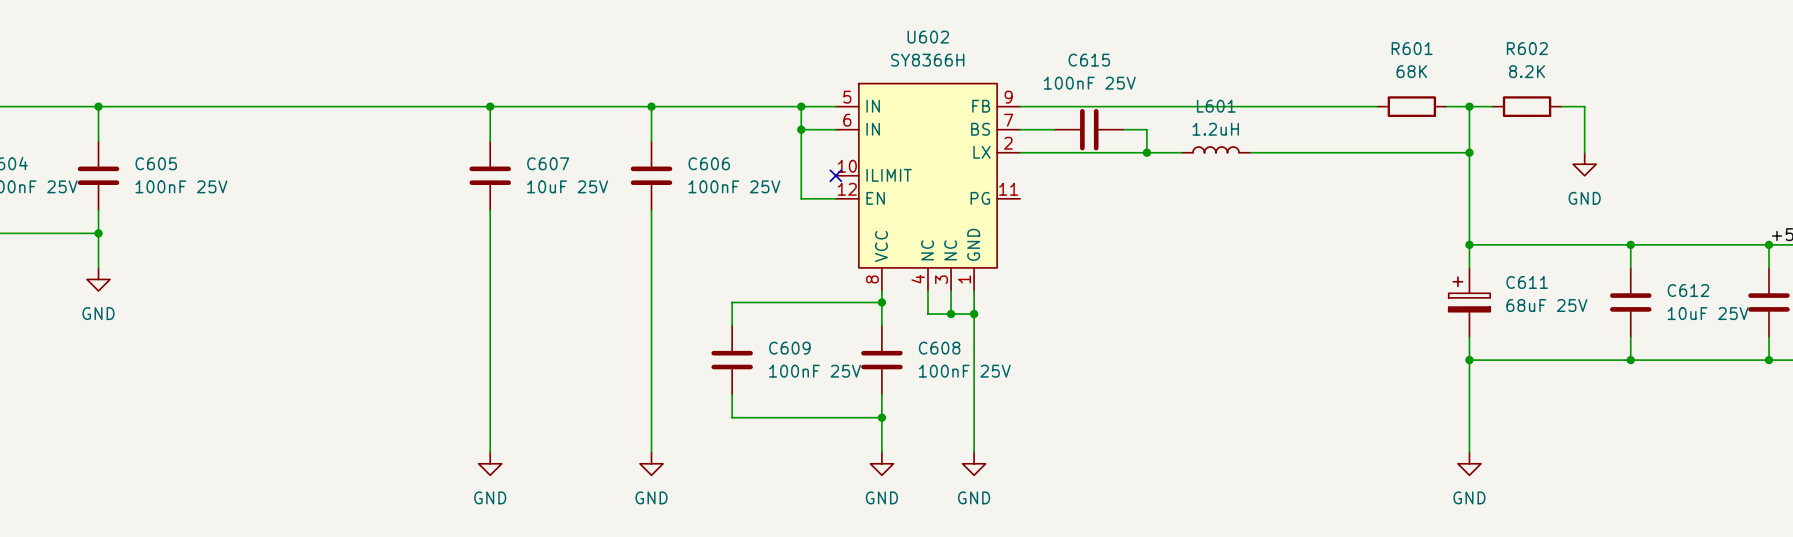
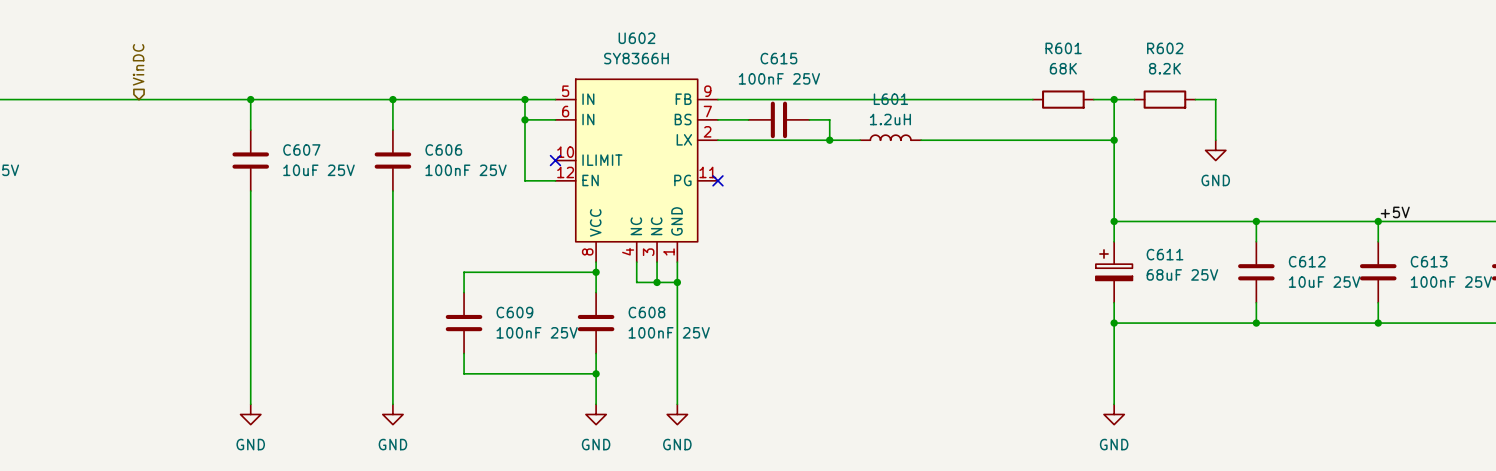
hierarchical label: none -> VinDC (138, 64)
no-connect mark: none -> (717, 180)

